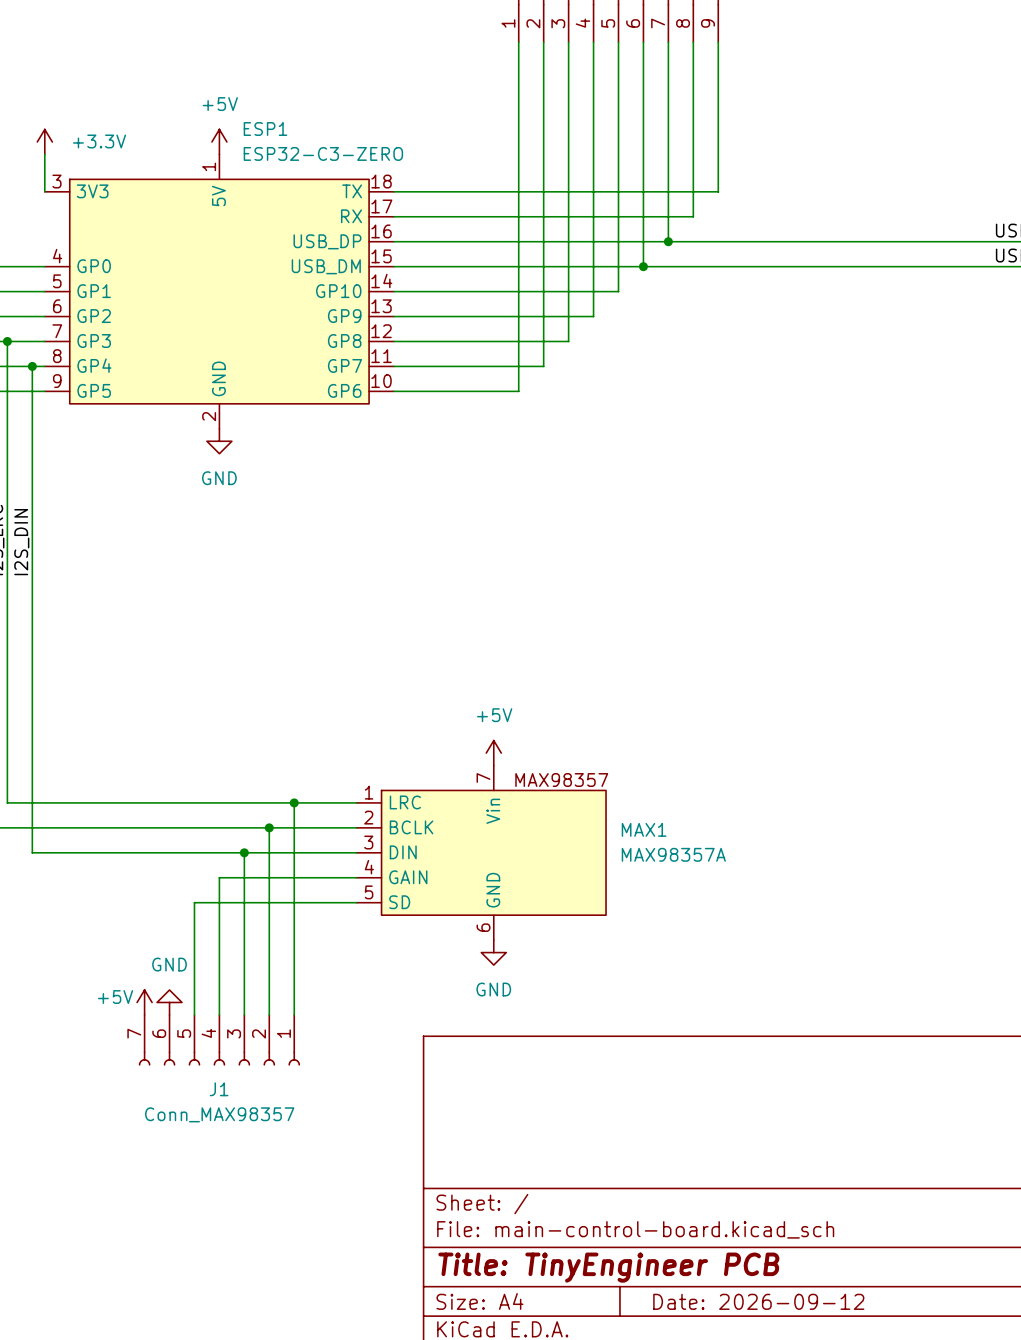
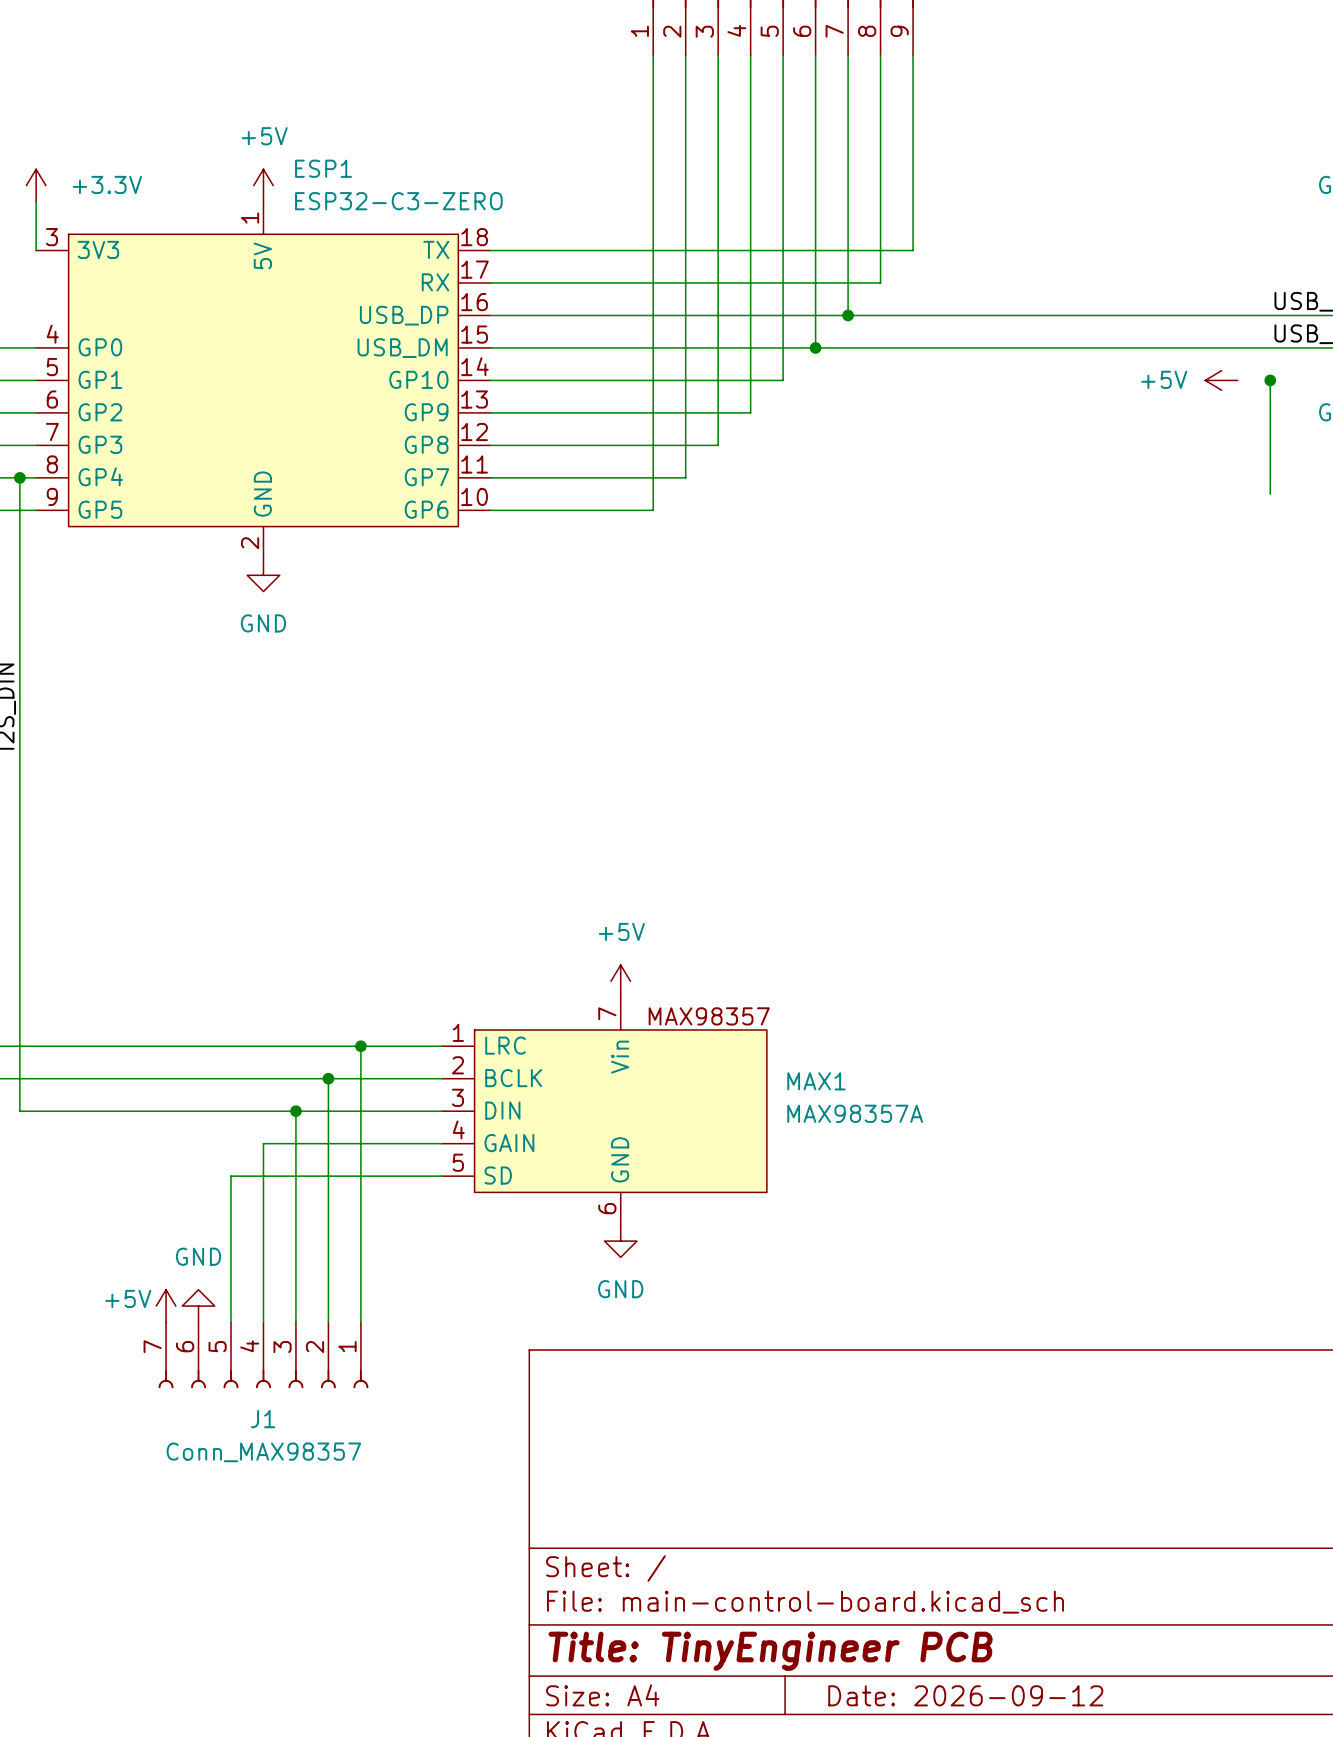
power symbol: none -> +5V (1221, 380)
wire: none -> (1270, 380) (1270, 494)
junction: none -> (1270, 380)

